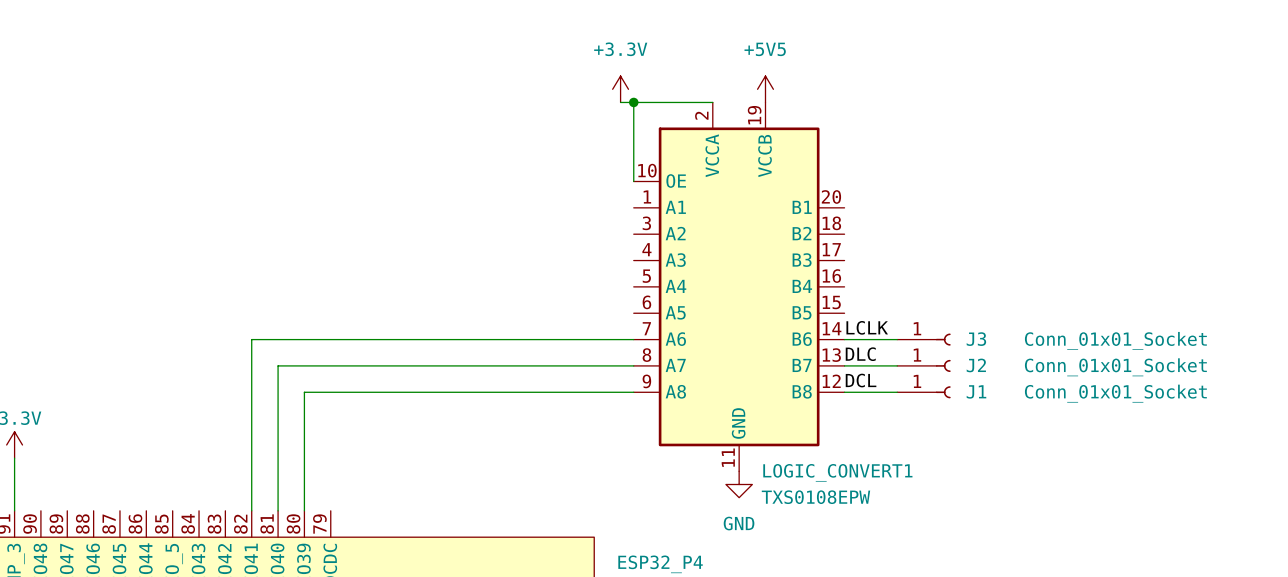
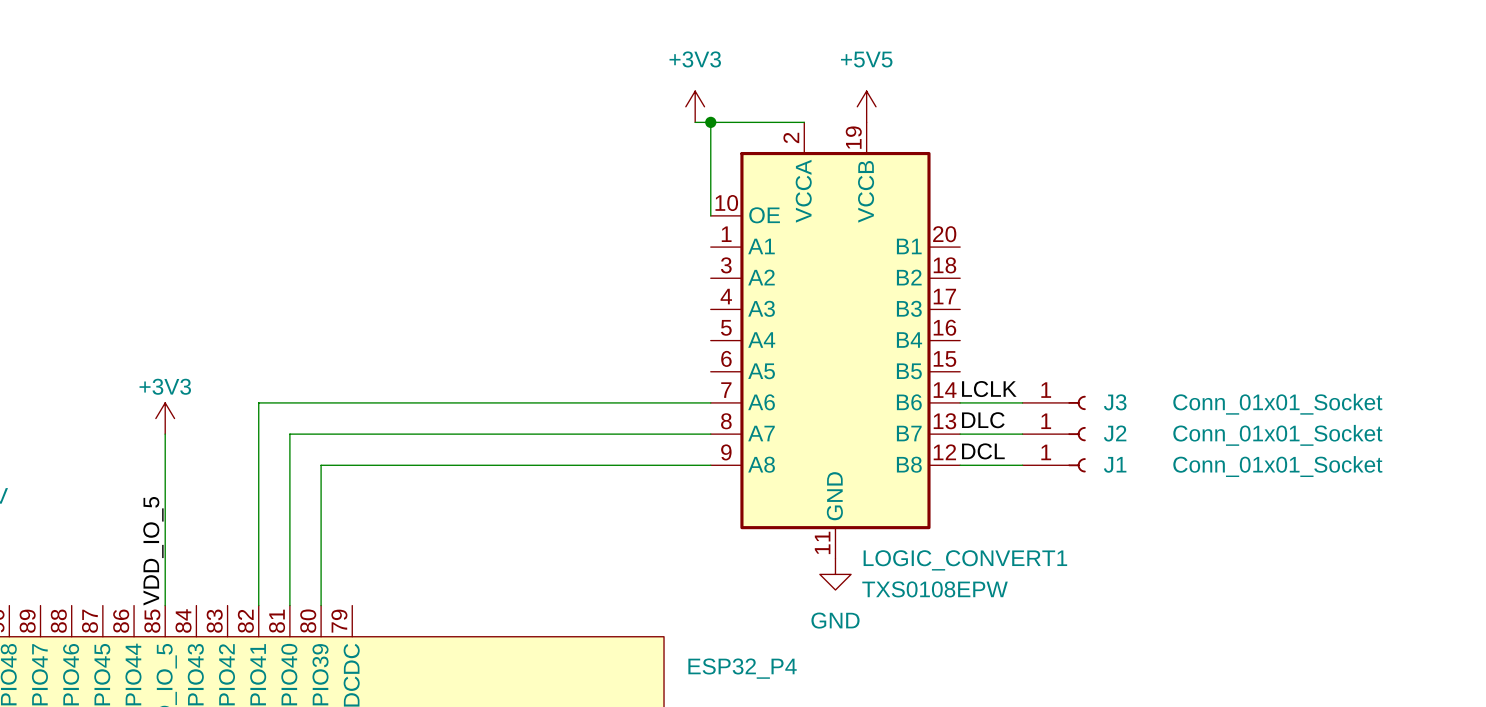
power symbol: +3.3V (620, 89) -> +3V3 (695, 106)
power symbol: none -> +3V3 (165, 418)
wire: none -> (165, 434) (165, 605)
label: none -> VDD_IO_5 (153, 551)

